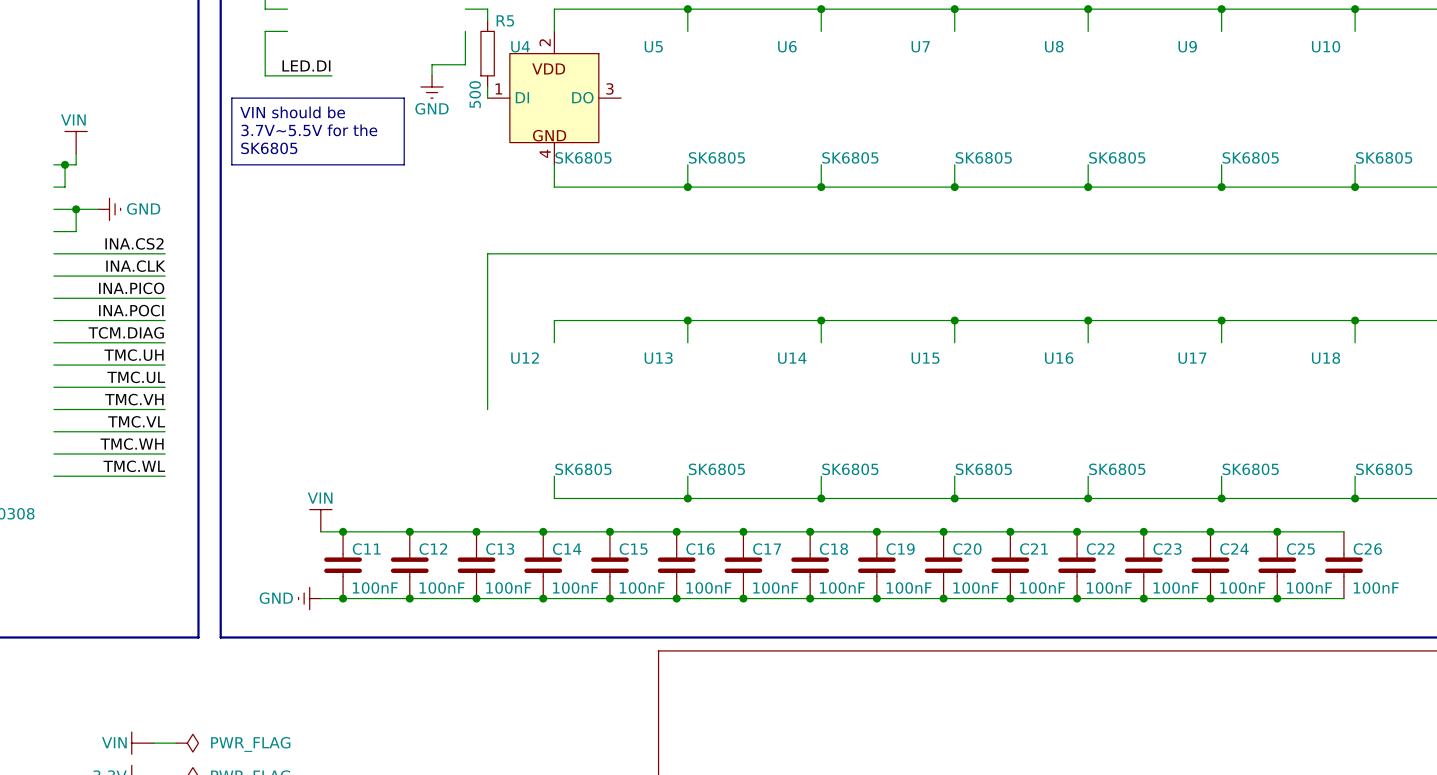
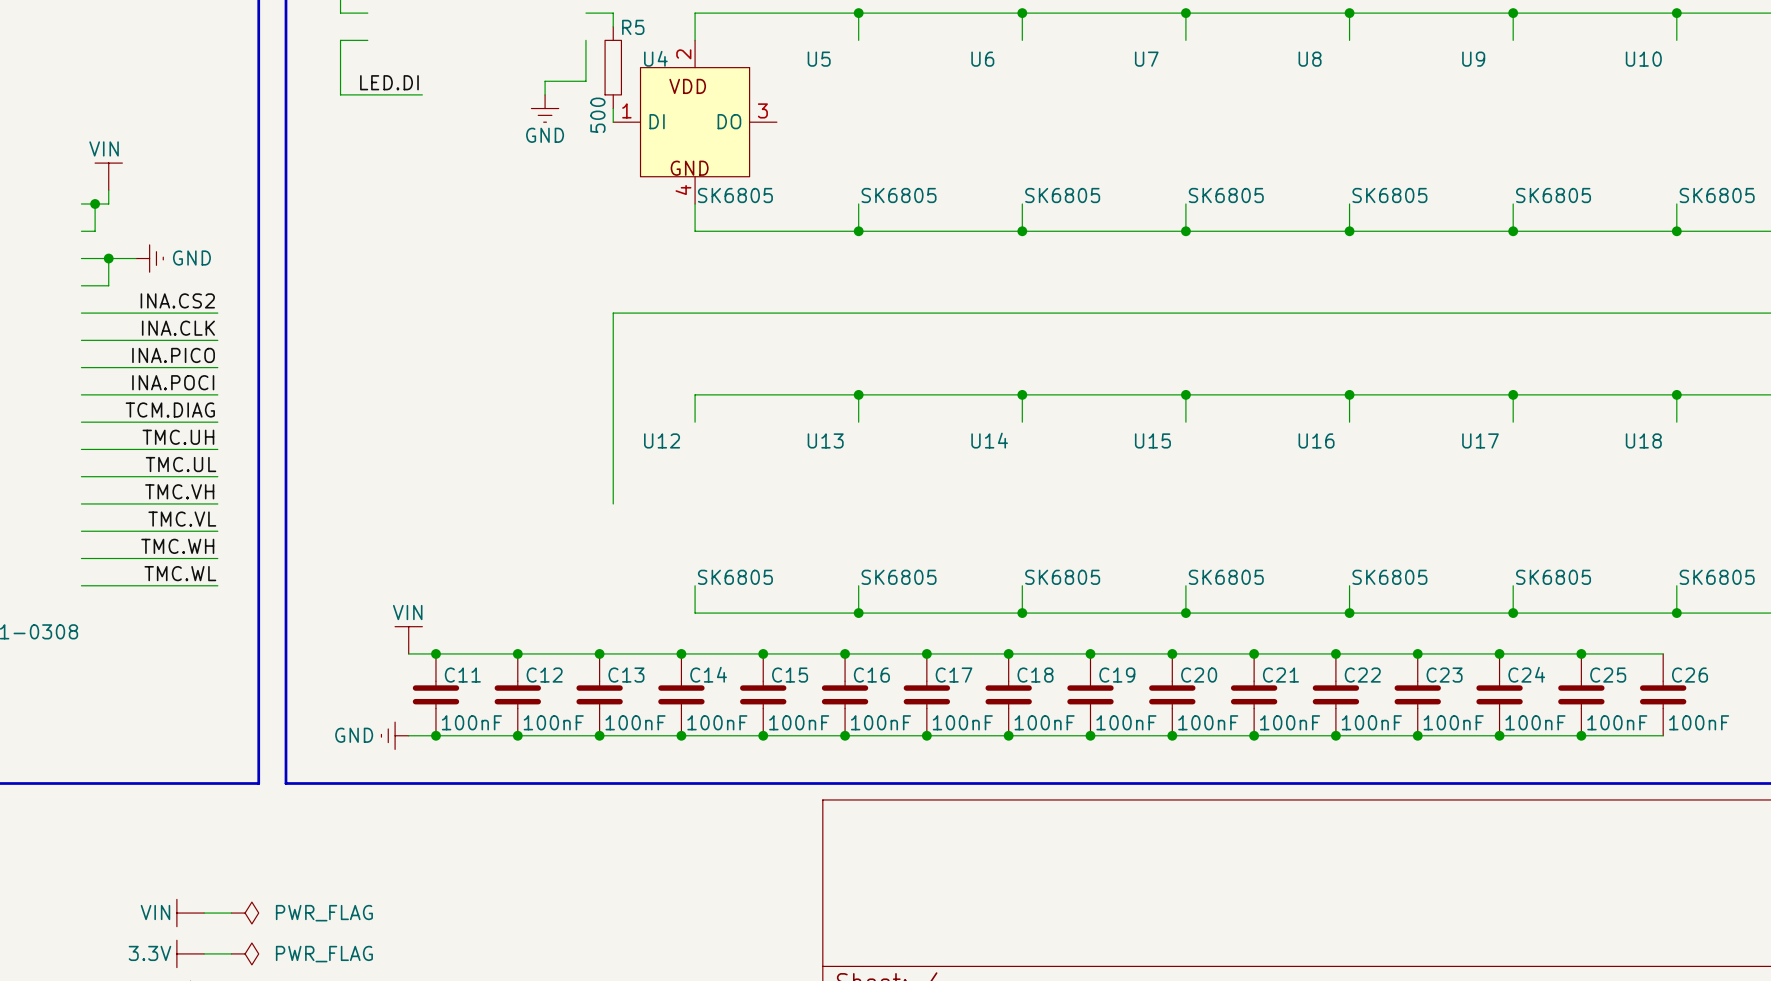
line: (231, 98) (404, 98) (404, 164) (231, 164) (231, 98) -> none
text: VIN should be (292, 112) -> none
text: 3.7V~5.5V for the (309, 130) -> none
text: SK6805 (269, 148) -> none

